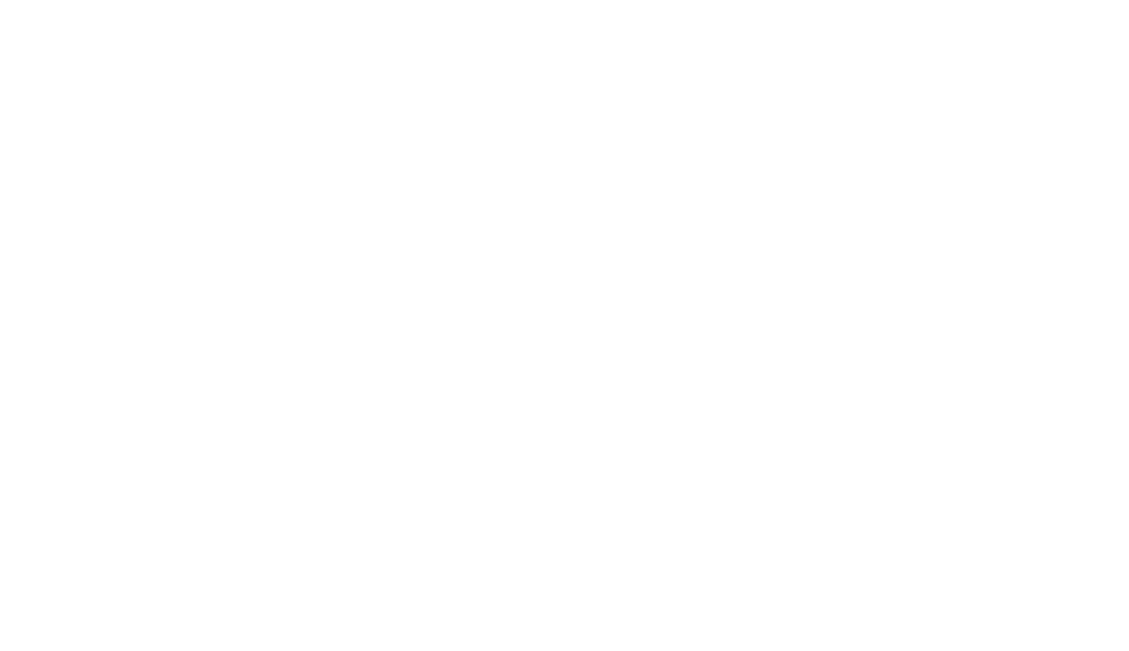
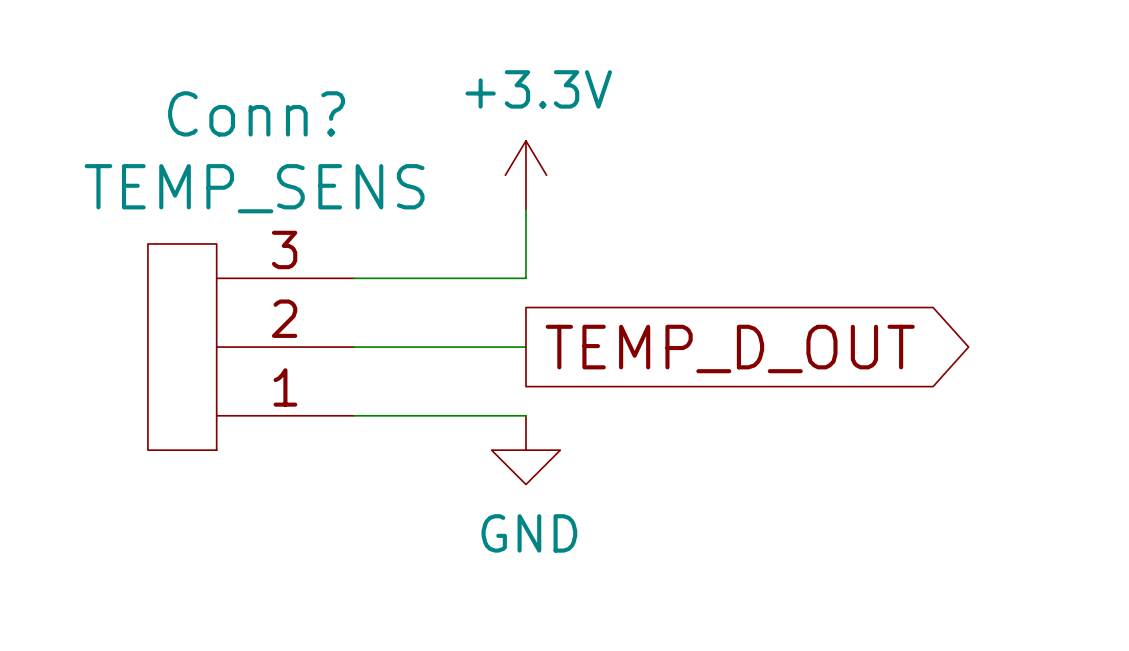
power symbol: none -> +3.3V (525, 175)
wire: none -> (525, 209) (525, 278) (354, 278)
Conn?: none -> TEMP_SENS (251, 347)
wire: none -> (354, 347) (525, 347)
global label: none -> TEMP_D_OUT (730, 348)
wire: none -> (354, 415) (525, 415)
power symbol: none -> GND (525, 450)

